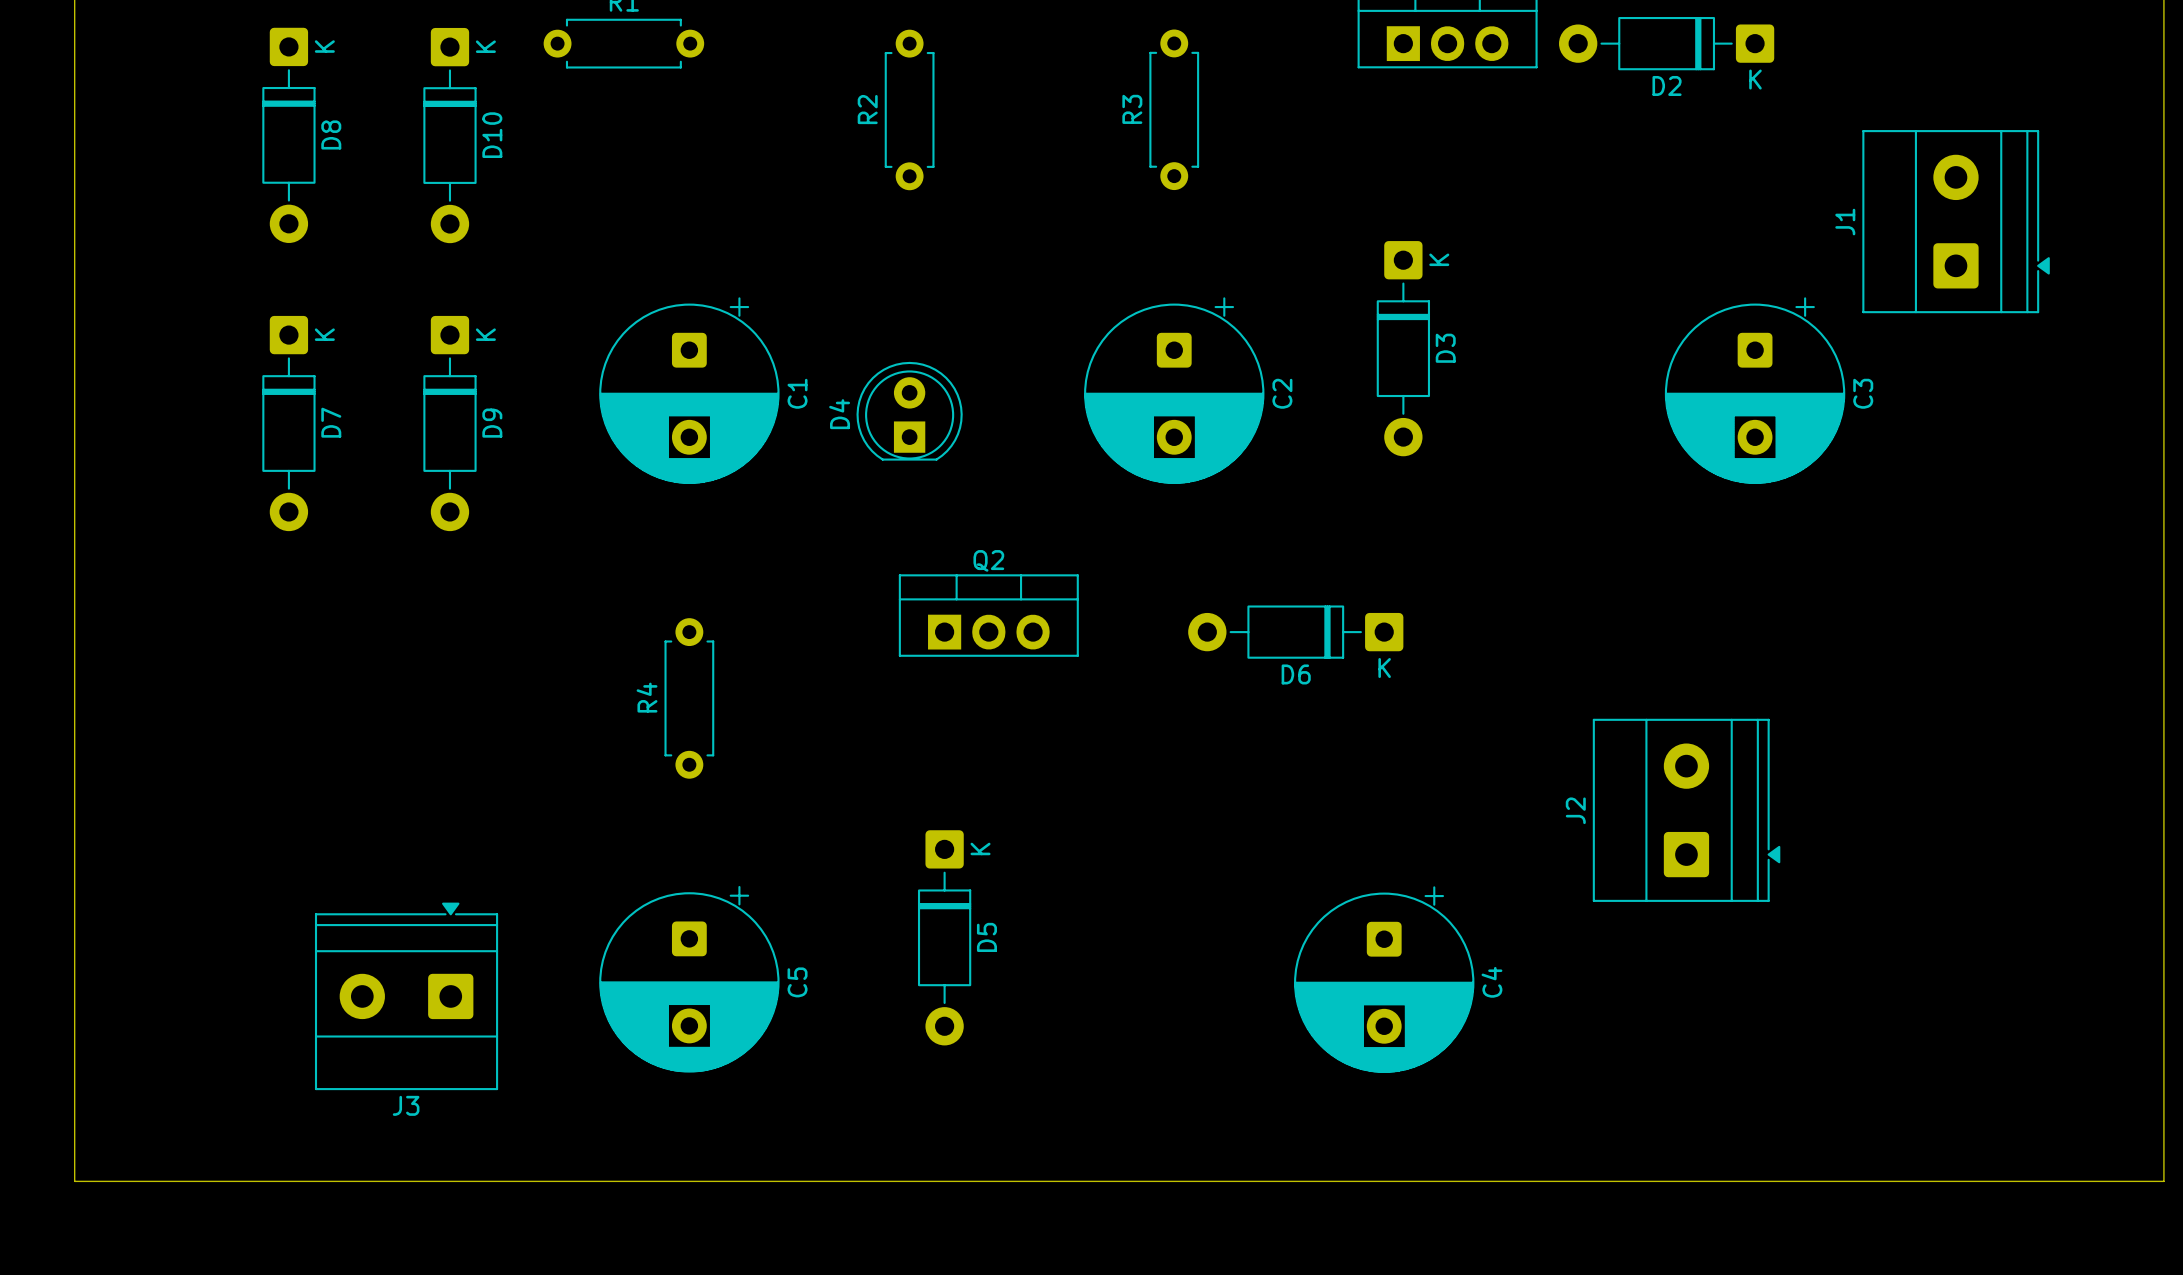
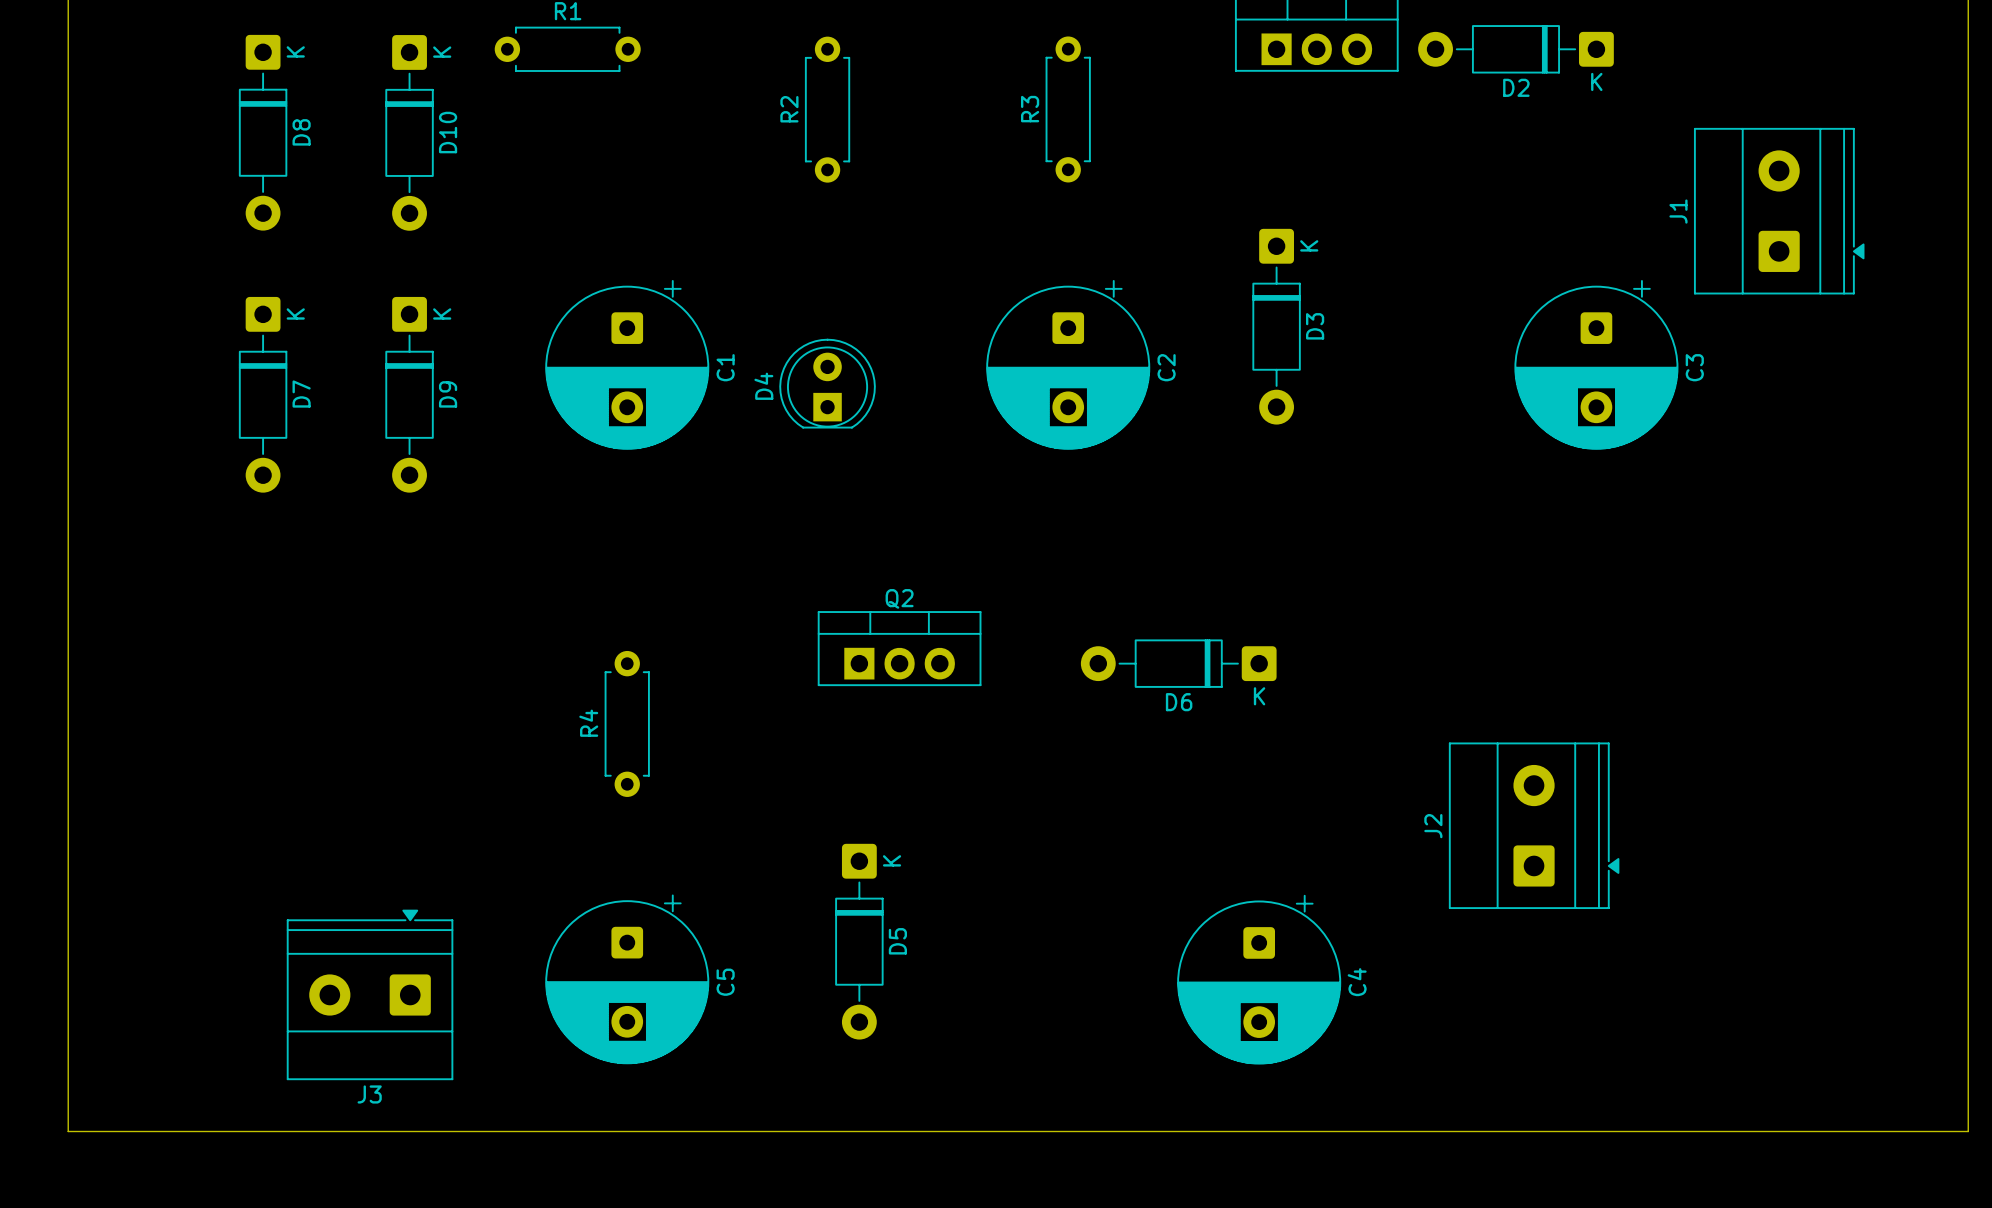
Q2 position: (988, 615) -> (899, 648)
D6 position: (1295, 632) -> (1178, 663)
R4 position: (689, 698) -> (627, 723)
J2 position: (1686, 810) -> (1534, 825)
D5 position: (944, 937) -> (859, 941)
C5 position: (689, 979) -> (627, 979)
C4 position: (1384, 979) -> (1259, 979)
J3 position: (406, 996) -> (370, 994)
board edge: (74, 1181) (2163, 1181) -> (68, 1084) (68, 1131) (1968, 1131) (1968, 1084)

